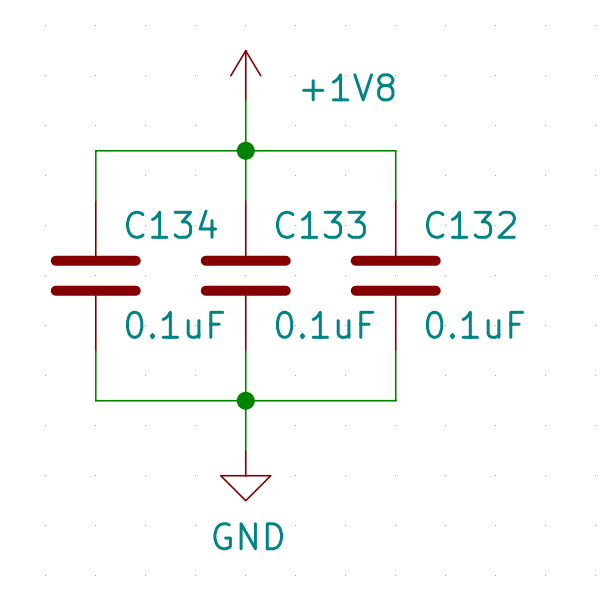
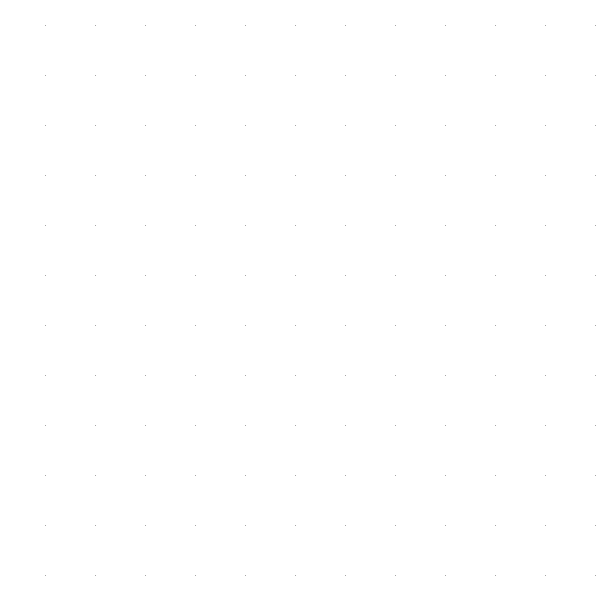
power symbol: +1V8 (245, 75) -> none
wire: (245, 100) (245, 200) -> none
junction: (245, 150) -> none
wire: (95, 200) (95, 150) (395, 150) (395, 200) -> none
C134: 0.1uF (95, 275) -> none
C133: 0.1uF (245, 275) -> none
C132: 0.1uF (395, 275) -> none
wire: (95, 350) (95, 400) (395, 400) (395, 350) -> none
wire: (245, 350) (245, 450) -> none
junction: (245, 400) -> none
power symbol: GND (245, 475) -> none

